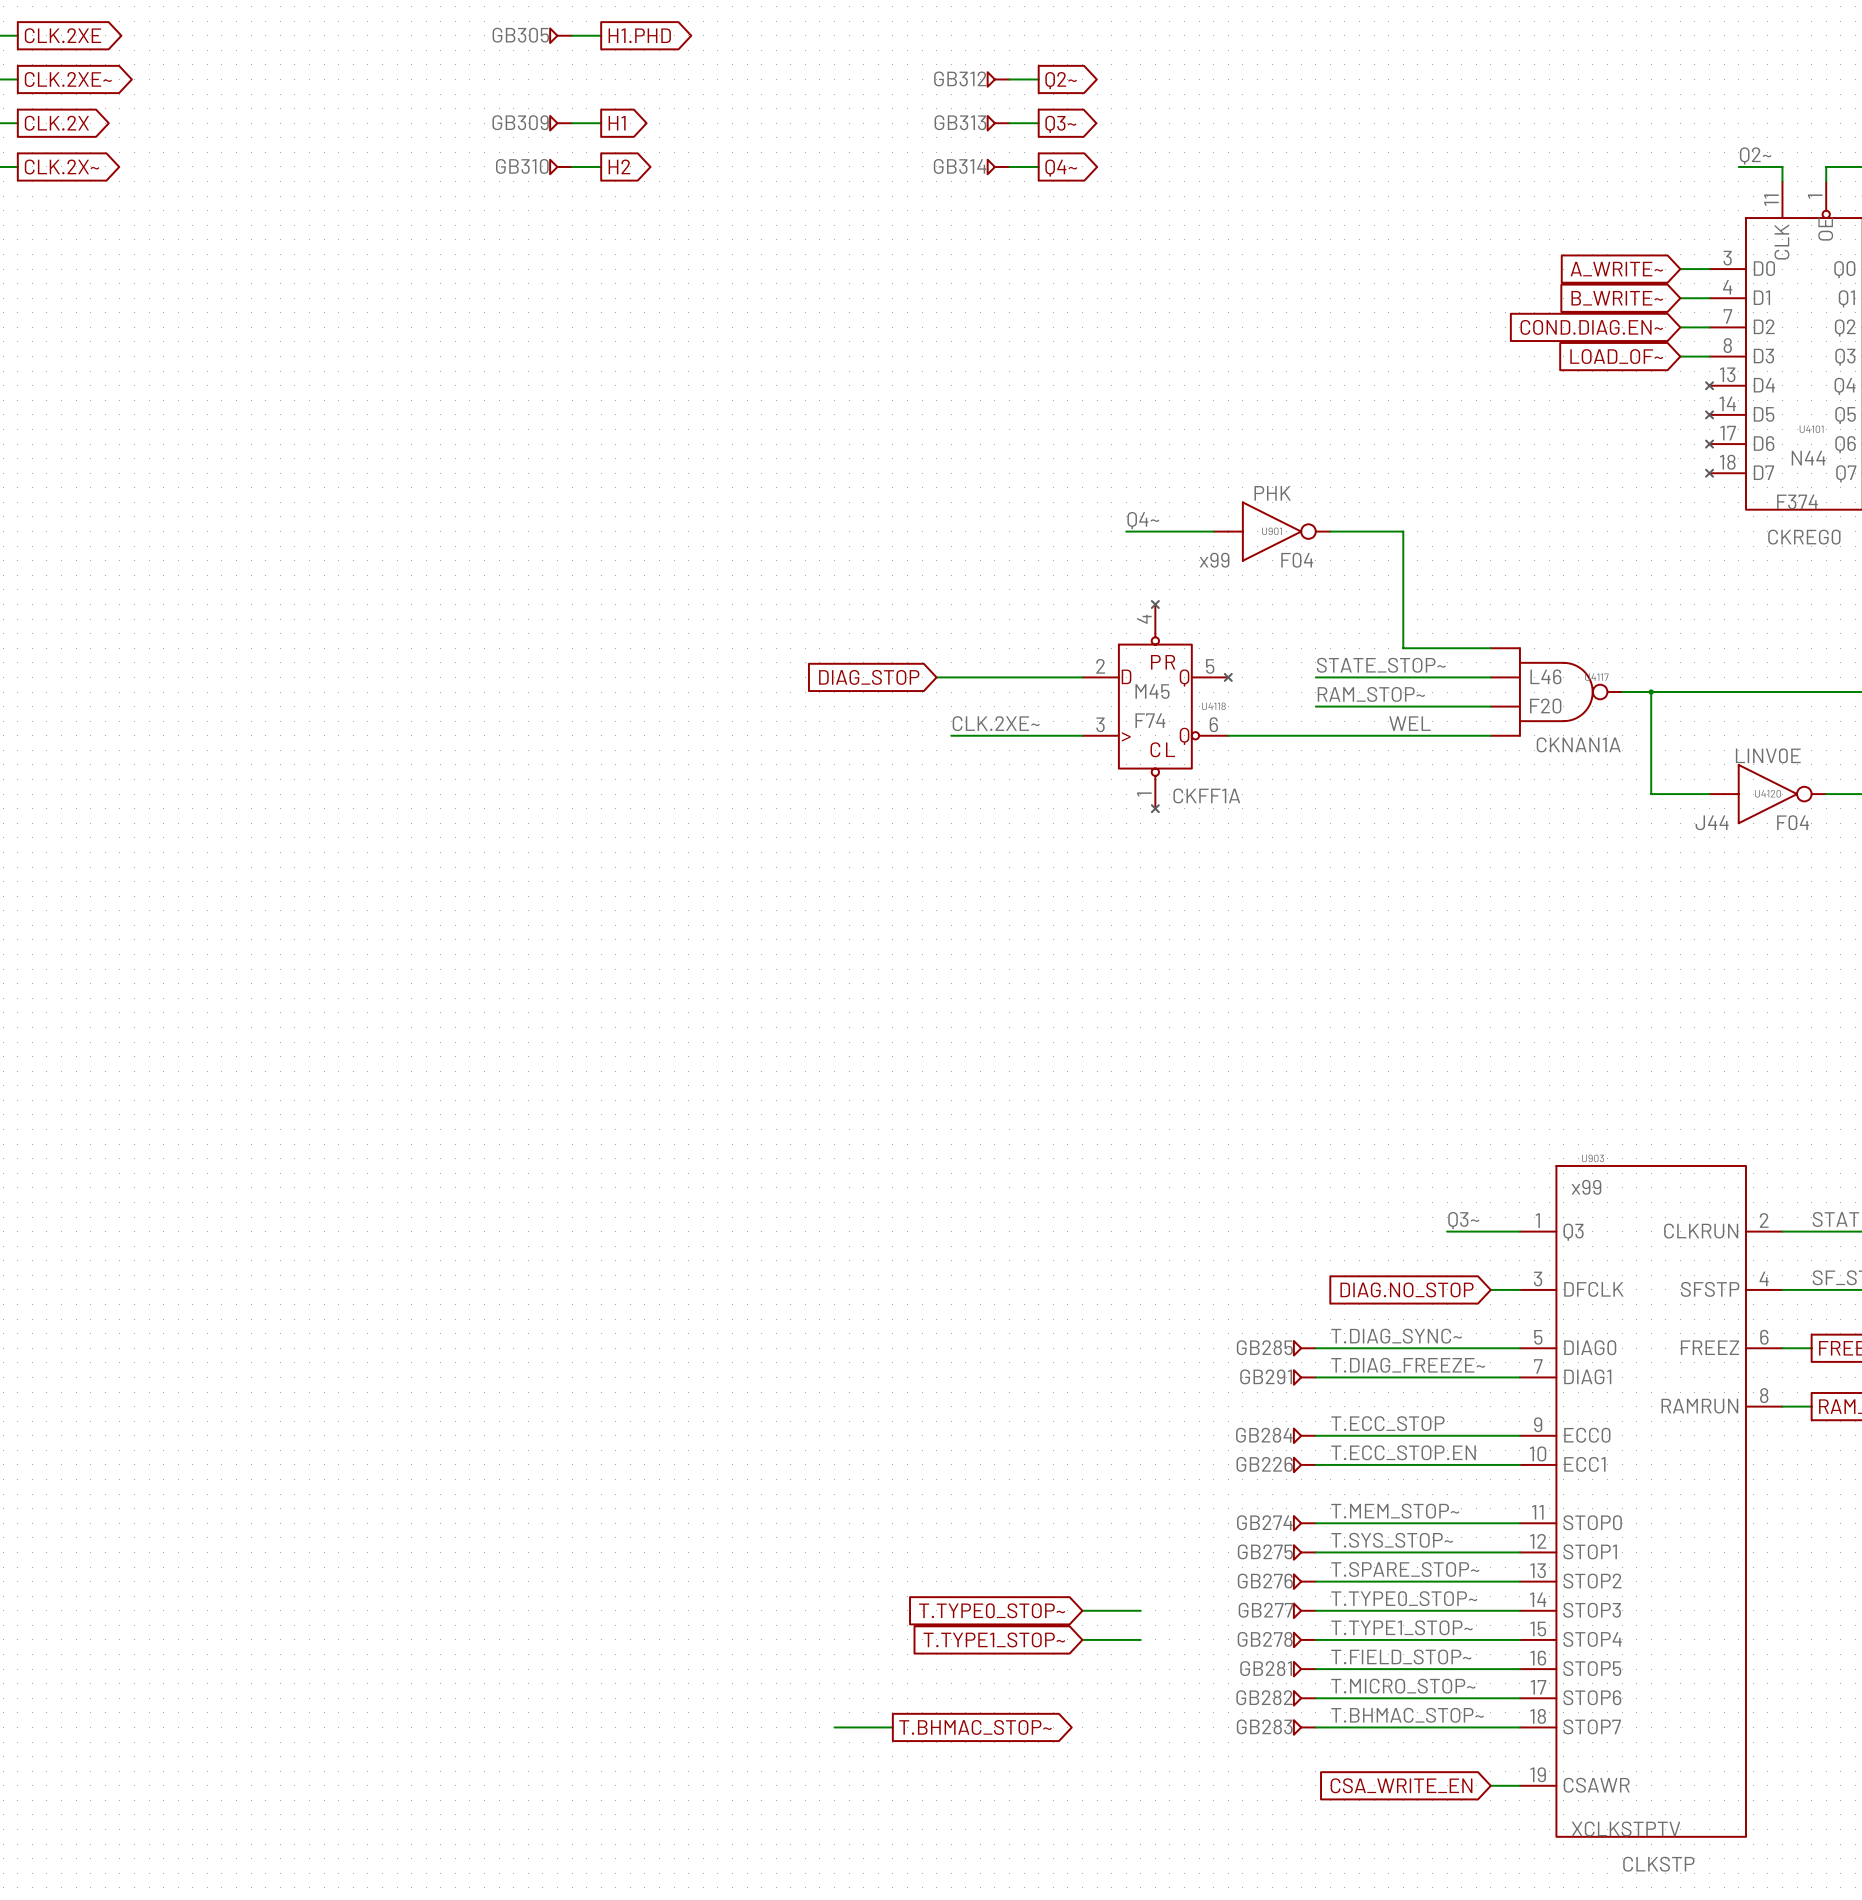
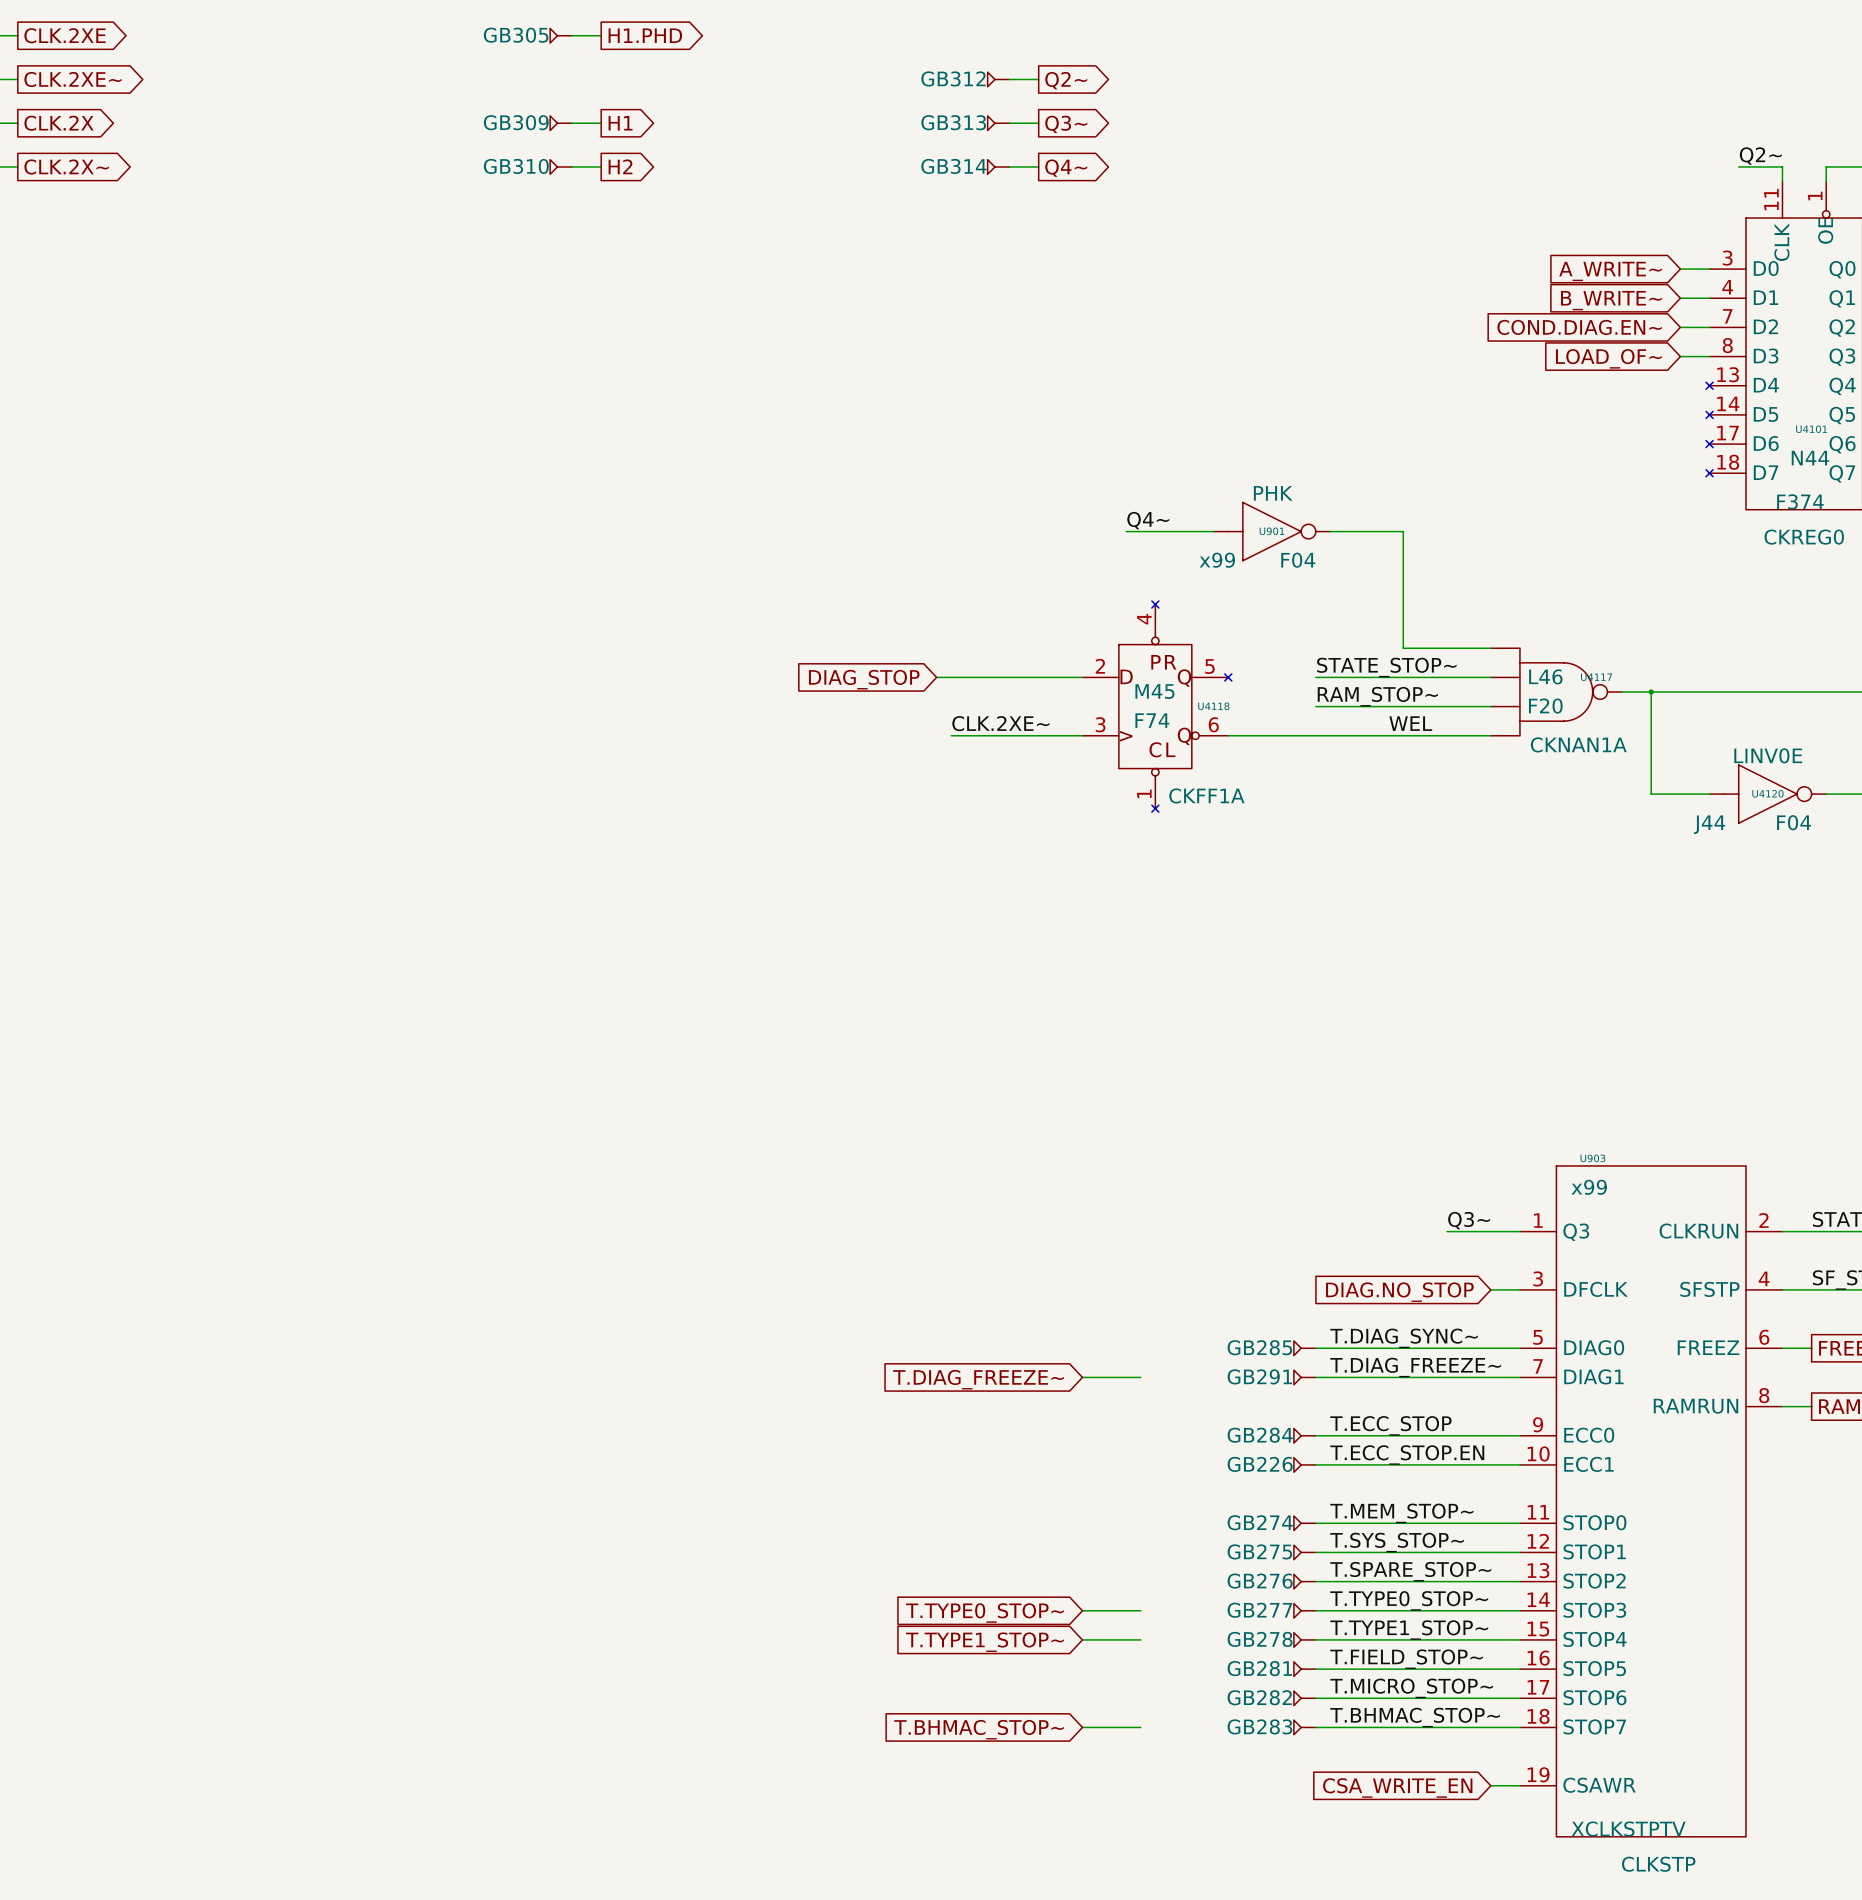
global label: none -> T.DIAG_FREEZE~ (978, 1379)
wire: none -> (1082, 1377) (1140, 1377)
wire: (834, 1727) (892, 1727) -> none
global label: T.BHMAC_STOP~ (975, 1727) -> none
global label: none -> T.BHMAC_STOP~ (979, 1729)
wire: none -> (1082, 1727) (1140, 1727)

